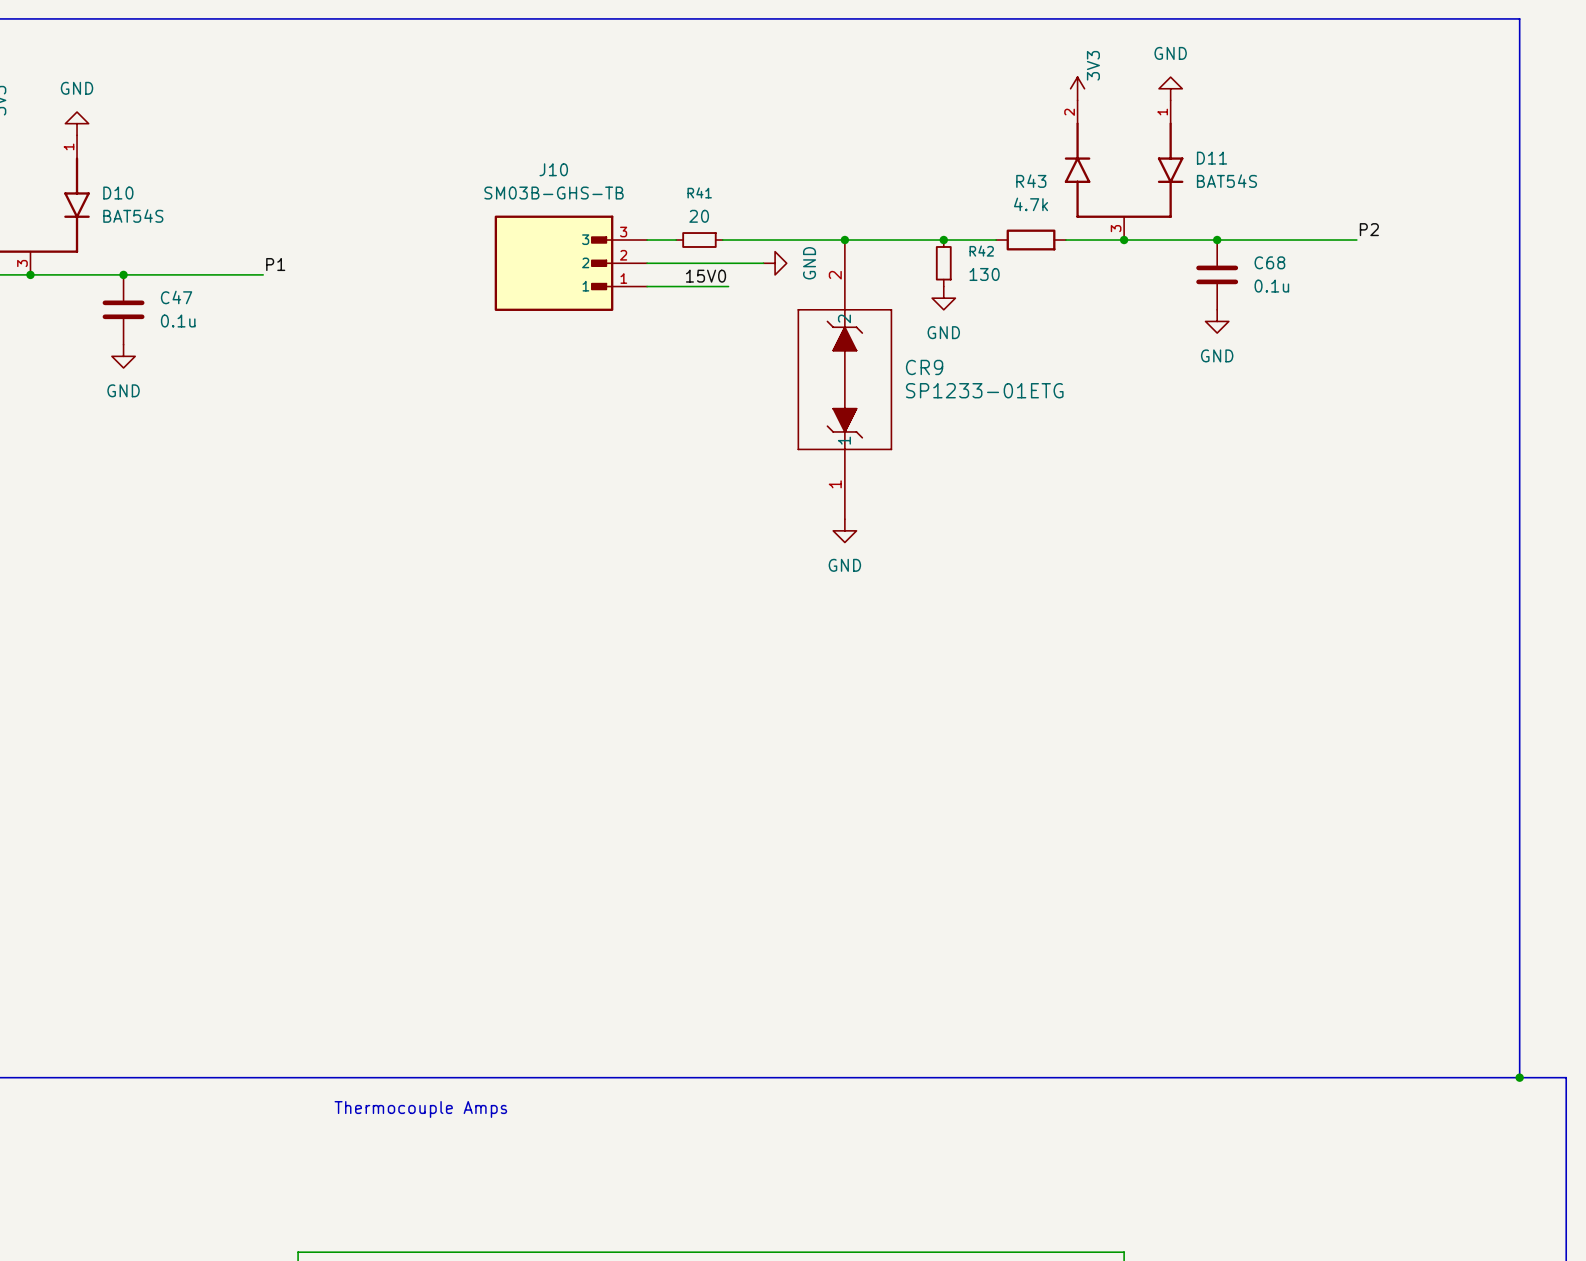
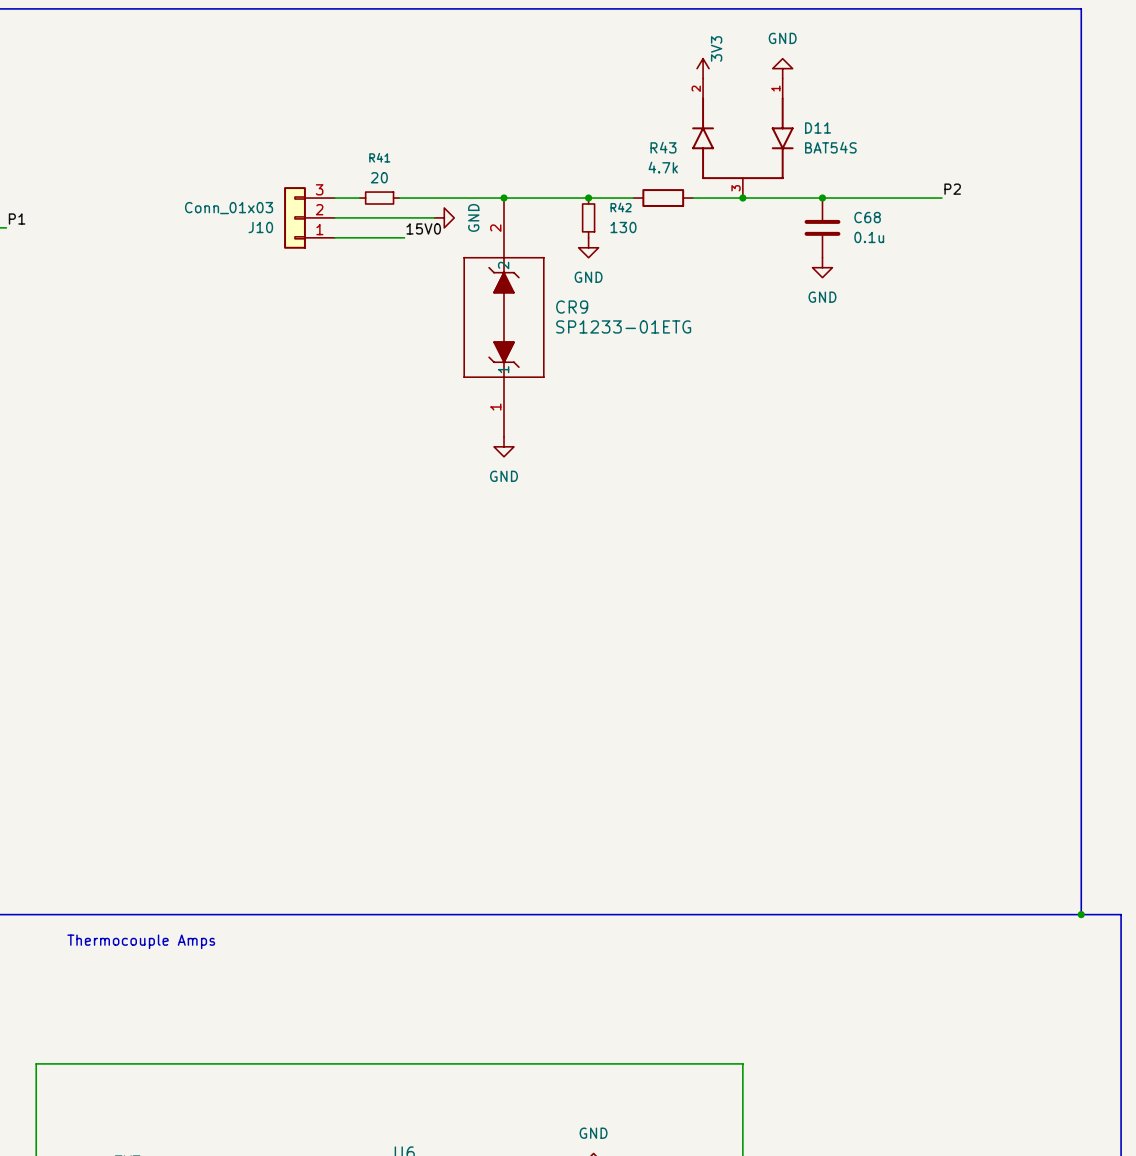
J10 name position: J10 (553, 169) -> J10 (260, 227)
J10 value: SM03B-GHS-TB (554, 193) -> Conn_01x03 (229, 208)
J10 symbol: [494, 215, 648, 311] -> [284, 187, 335, 249]
label position: 15V0 (706, 276) -> 15V0 (423, 228)

